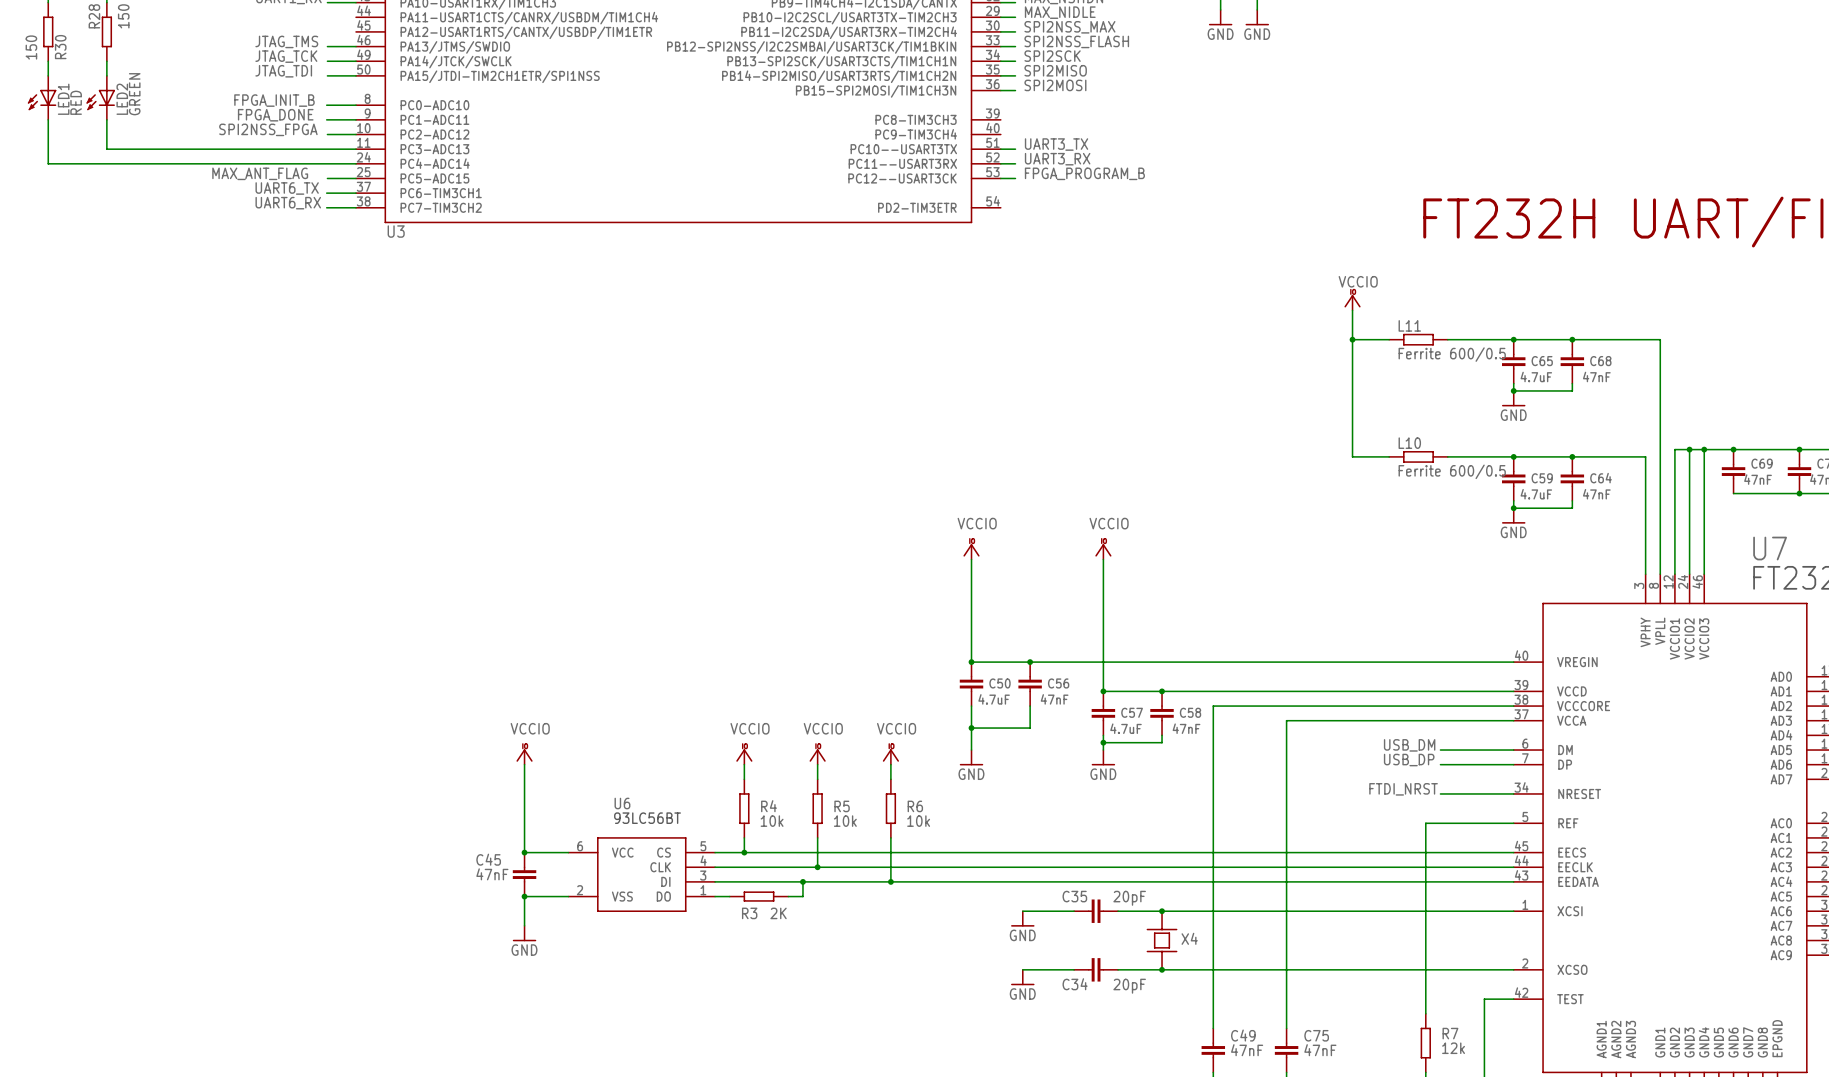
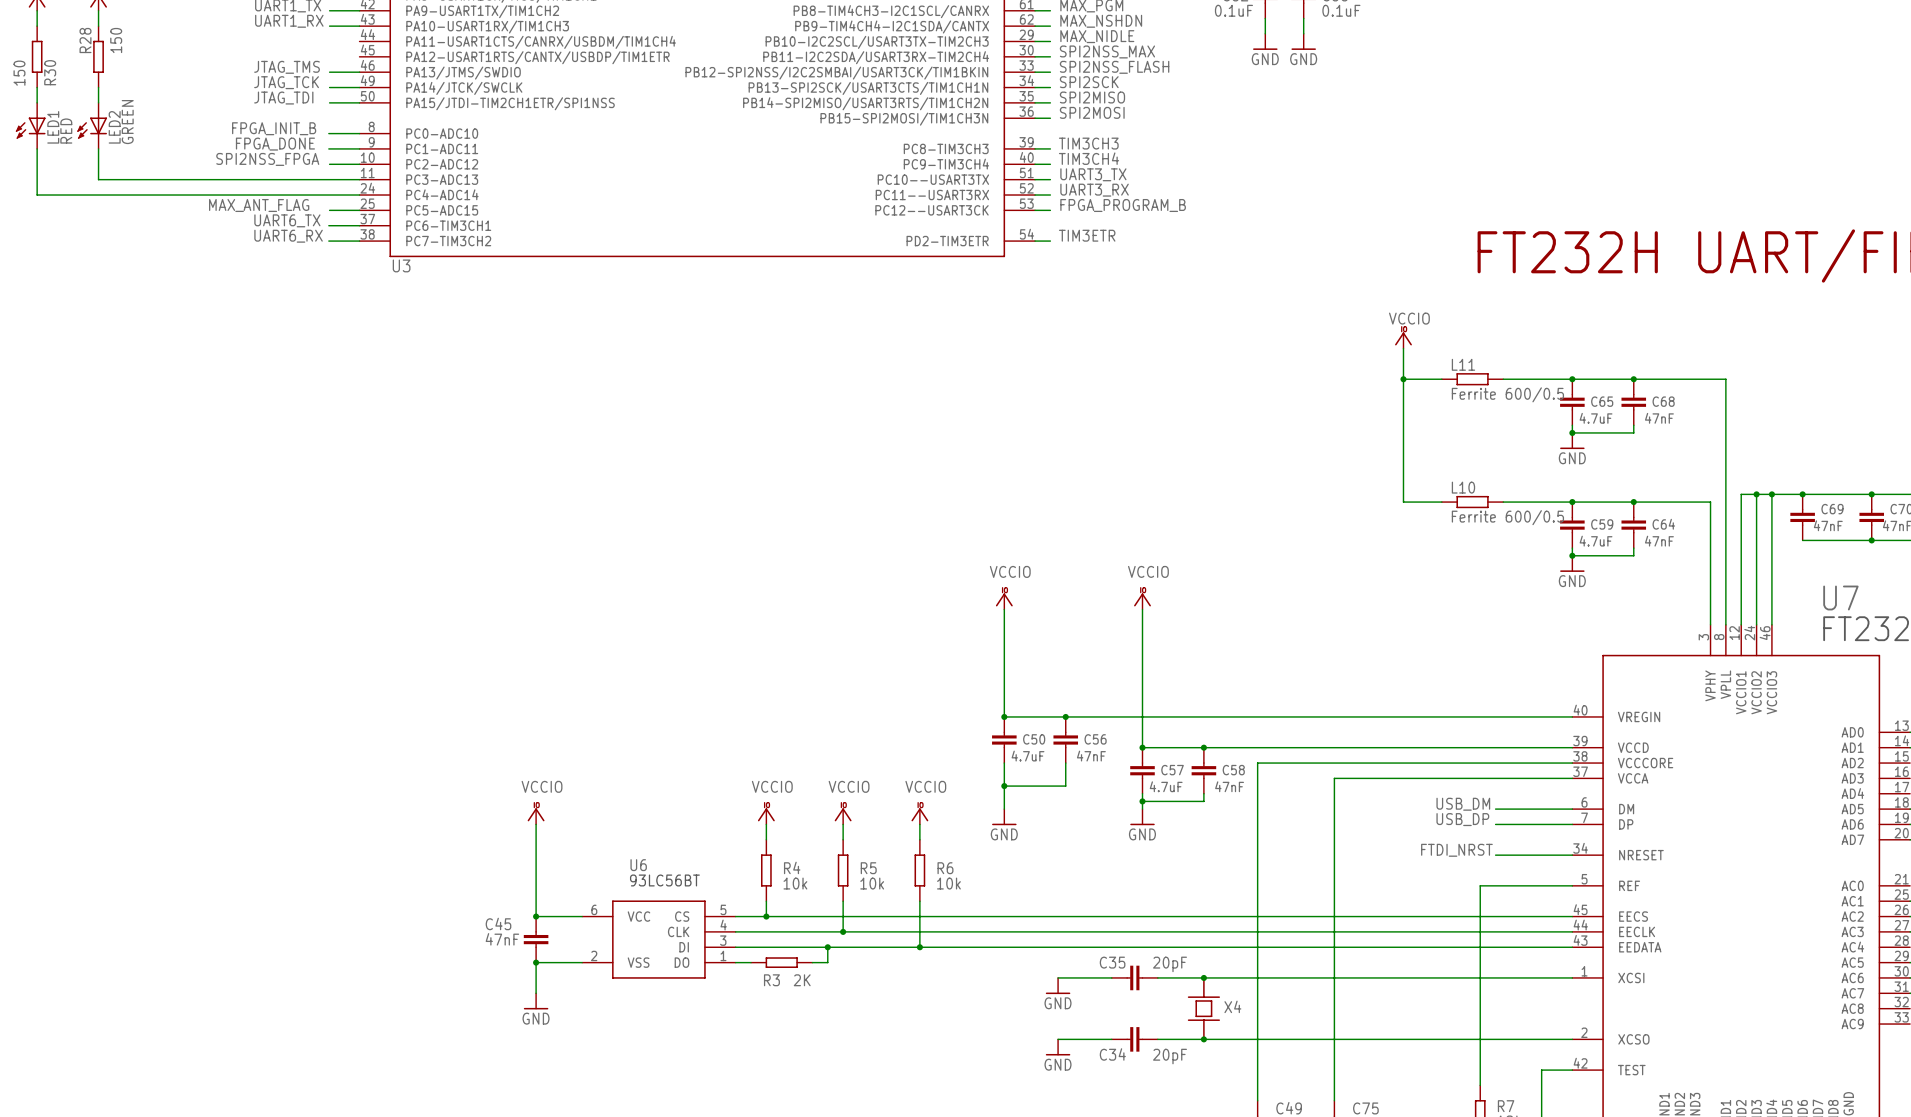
label: none -> TIM3CH3 (1088, 143)
wire: none -> (1035, 148) (1050, 148)
label: none -> TIM3CH4 (1089, 158)
wire: none -> (1035, 164) (1050, 164)
label: none -> TIM3ETR (1087, 235)
wire: none -> (1035, 241) (1050, 241)

